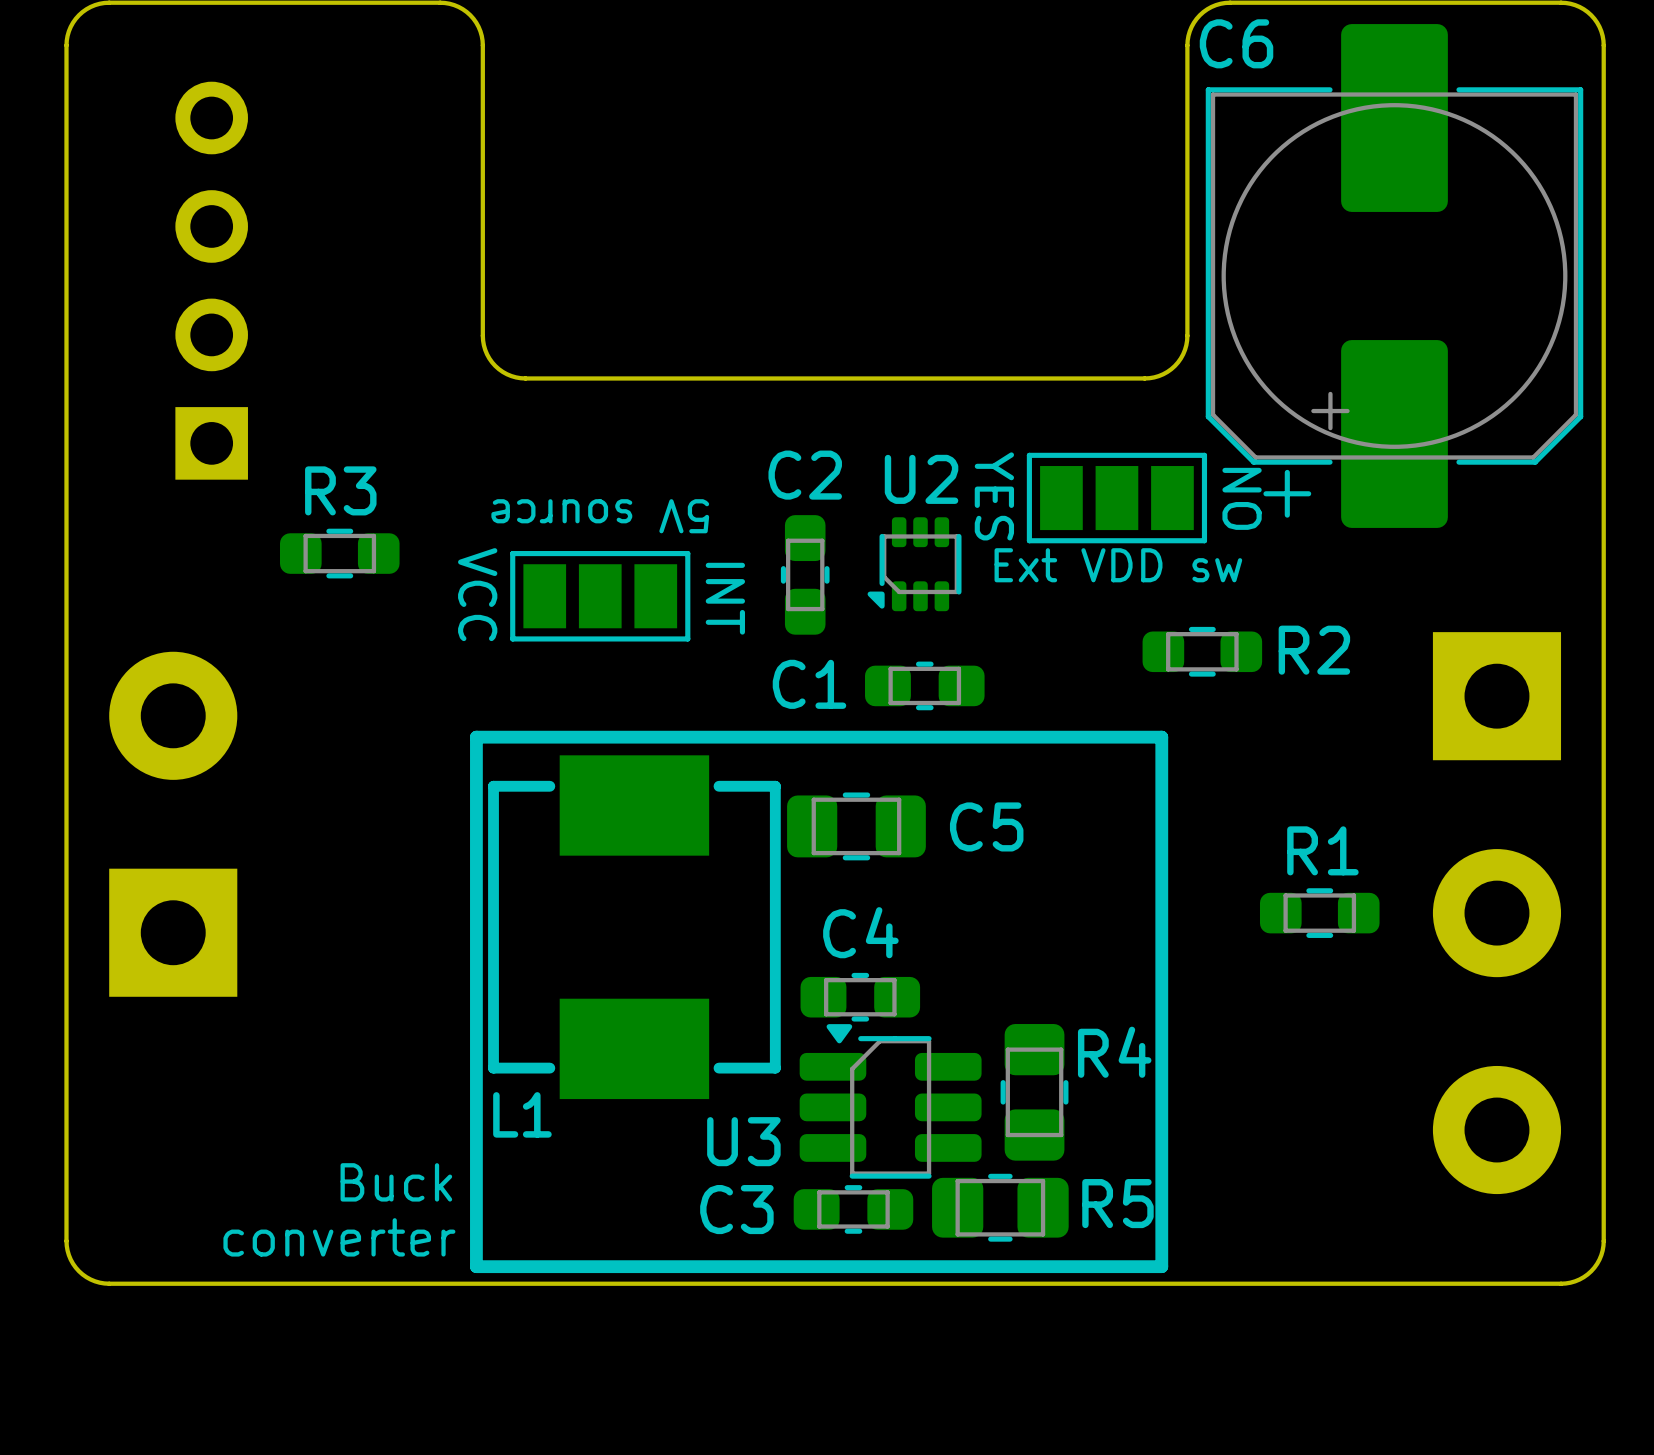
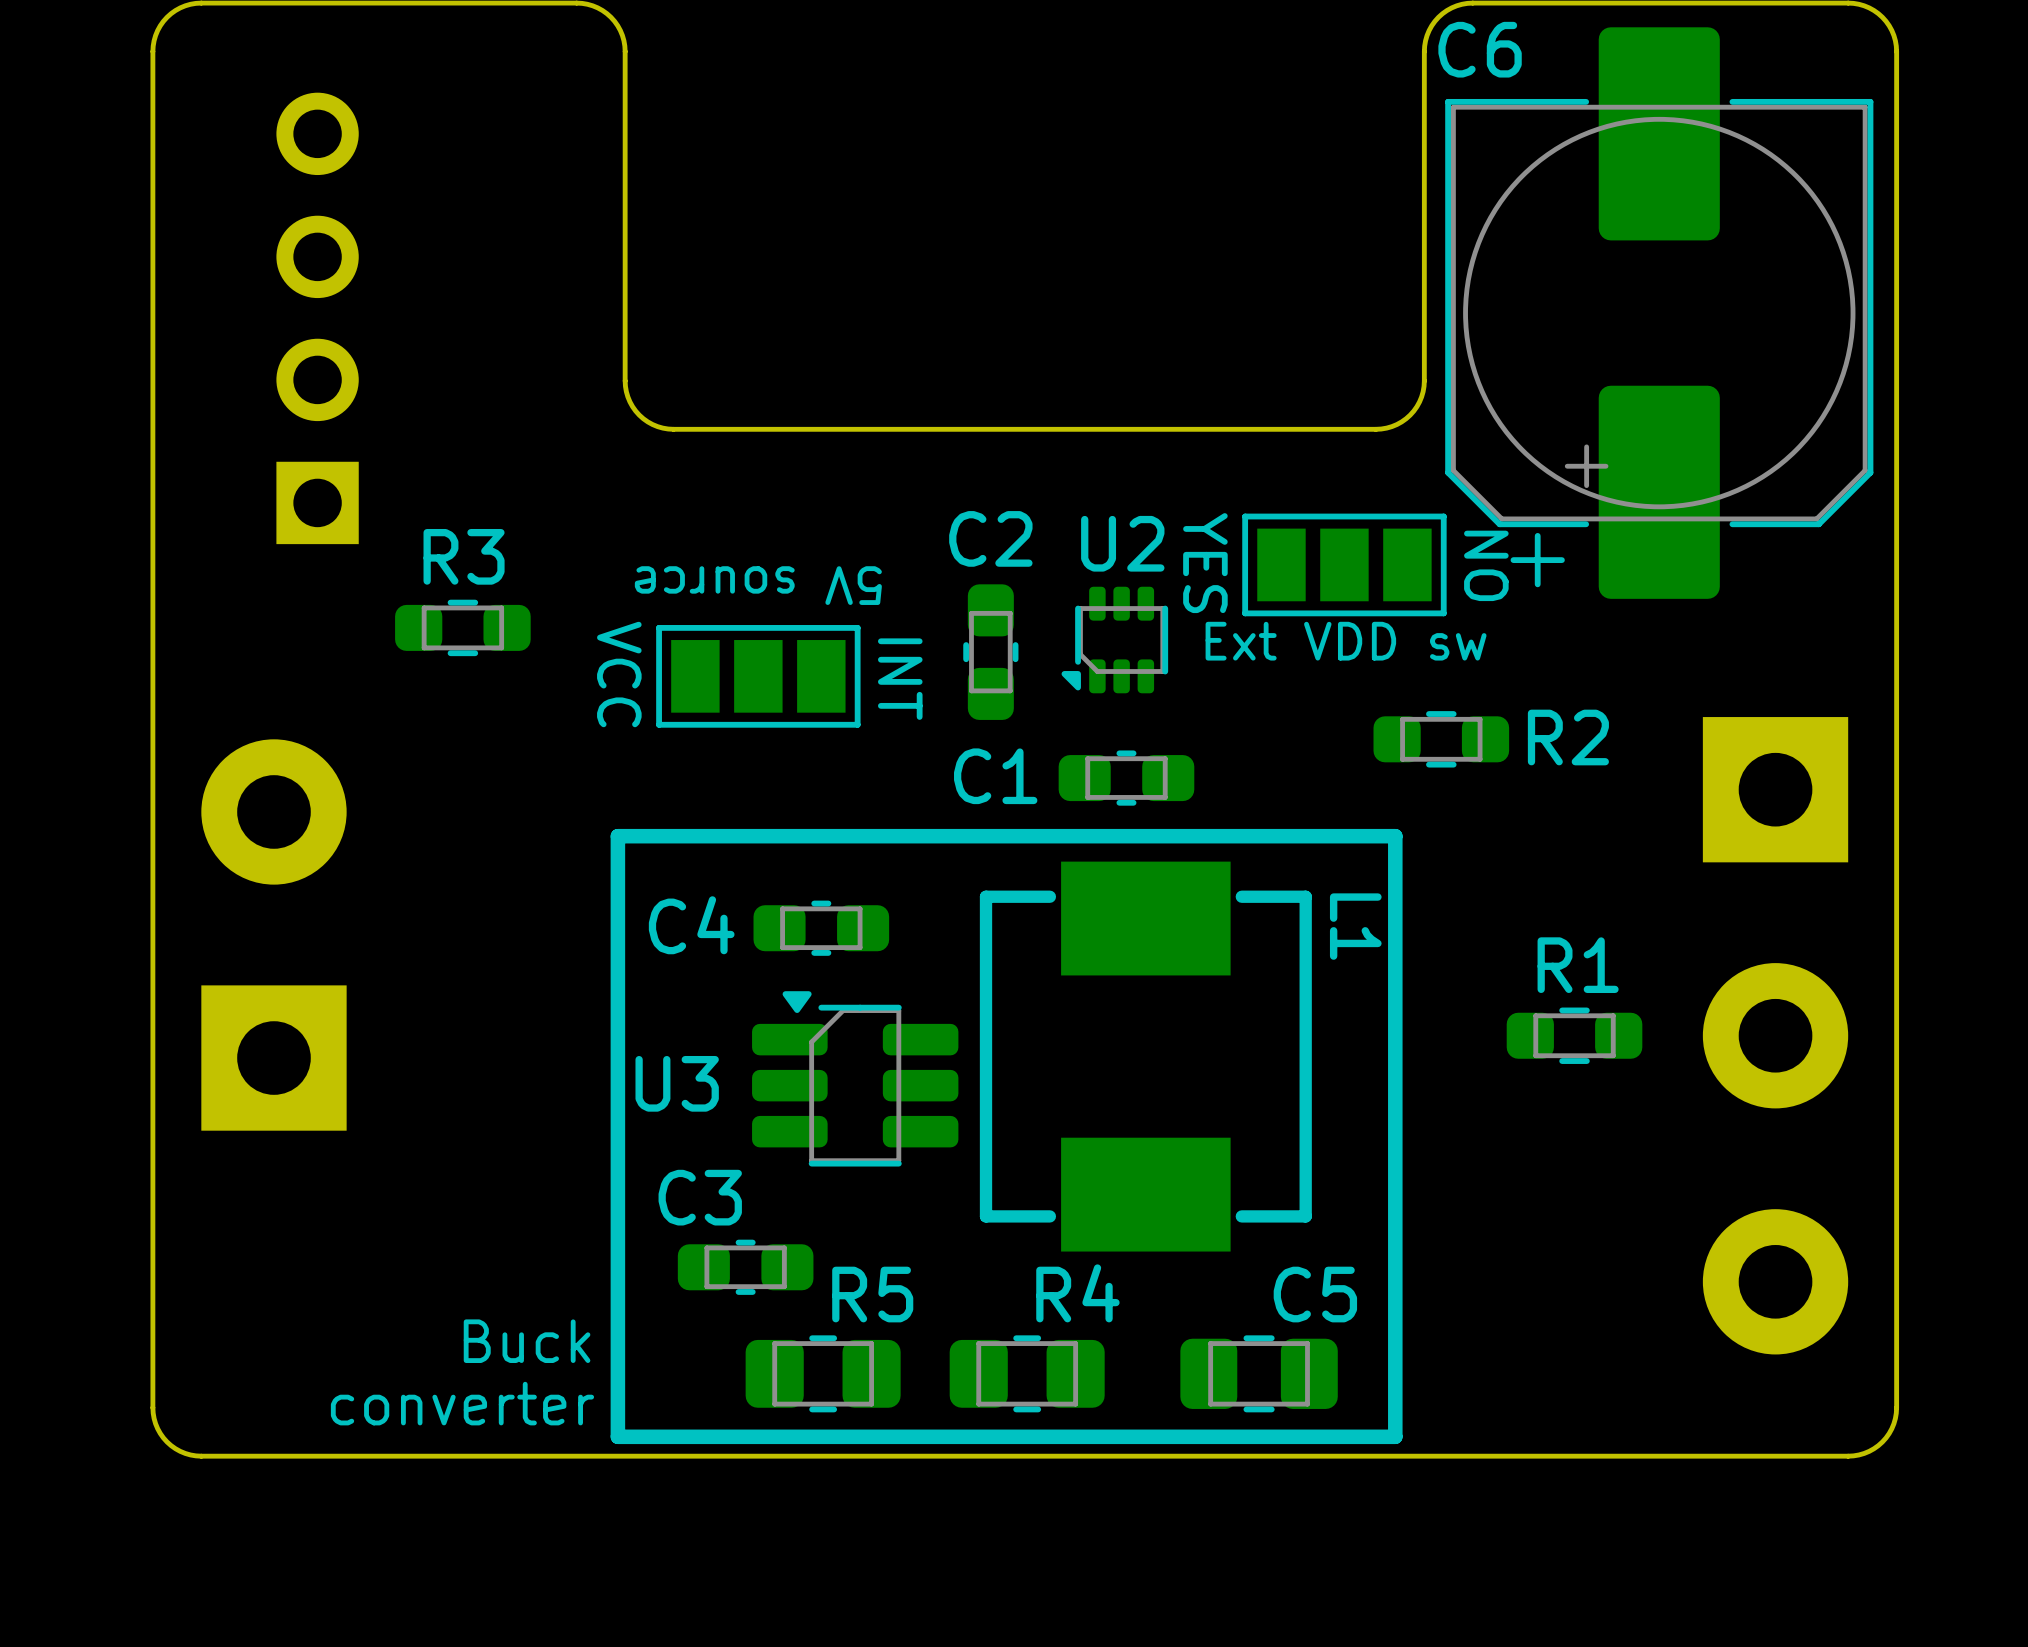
C5 position: (856, 826) -> (1259, 1373)
C5 name position: C5 (986, 826) -> C5 (1315, 1294)
L1 position: (634, 927) -> (1145, 1056)
C4 name position: C4 (860, 932) -> C4 (691, 925)
C4 position: (860, 997) -> (821, 928)
R4 rotation: 0° (1034, 1092) -> 90° clockwise (1027, 1373)
R4 position: (1034, 1092) -> (1027, 1373)
U3 position: (890, 1101) -> (855, 1078)
L1 name rotation: 0° (522, 1114) -> 90° clockwise (1355, 926)
L1 name position: L1 (522, 1114) -> L1 (1355, 926)
U3 name position: U3 (743, 1141) -> U3 (677, 1083)
R5 name position: R5 (1117, 1203) -> R5 (872, 1294)
R5 position: (1000, 1207) -> (823, 1373)
C3 name position: C3 (736, 1209) -> C3 (700, 1197)
C3 position: (853, 1209) -> (745, 1267)

